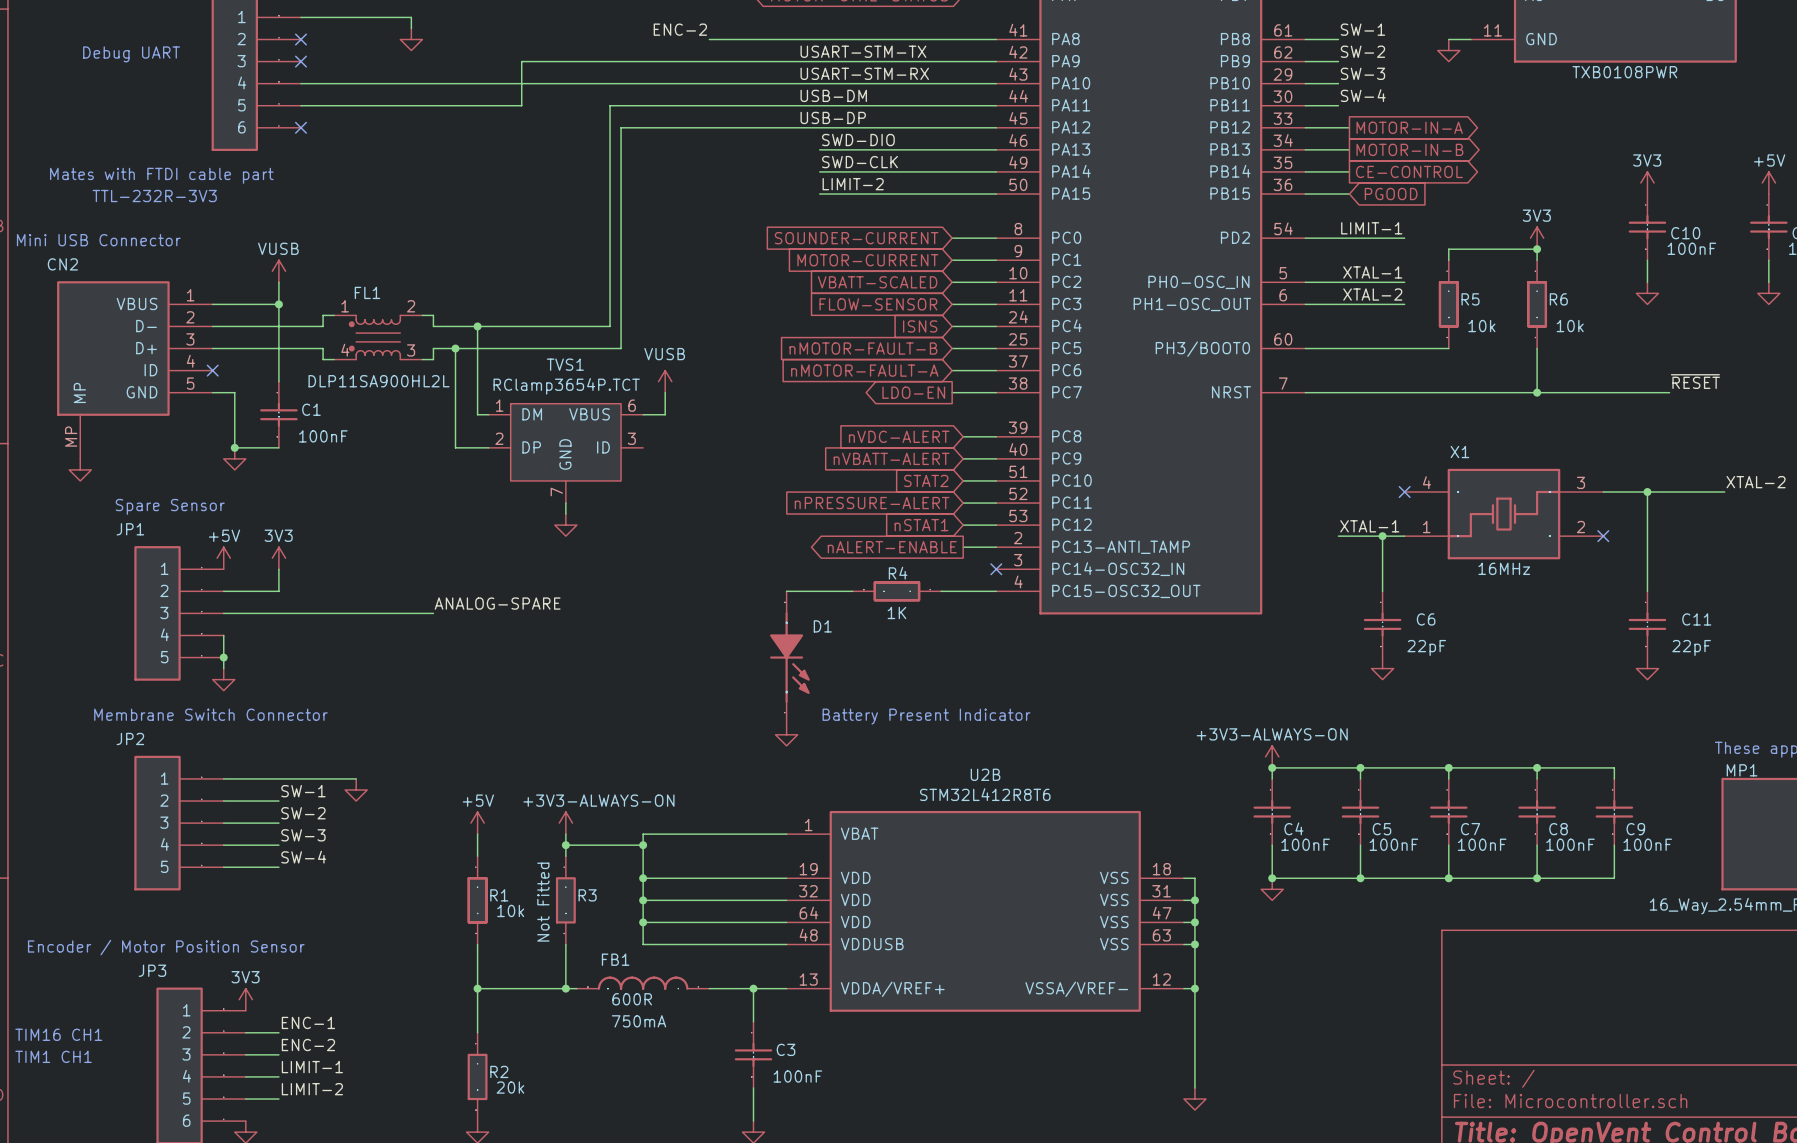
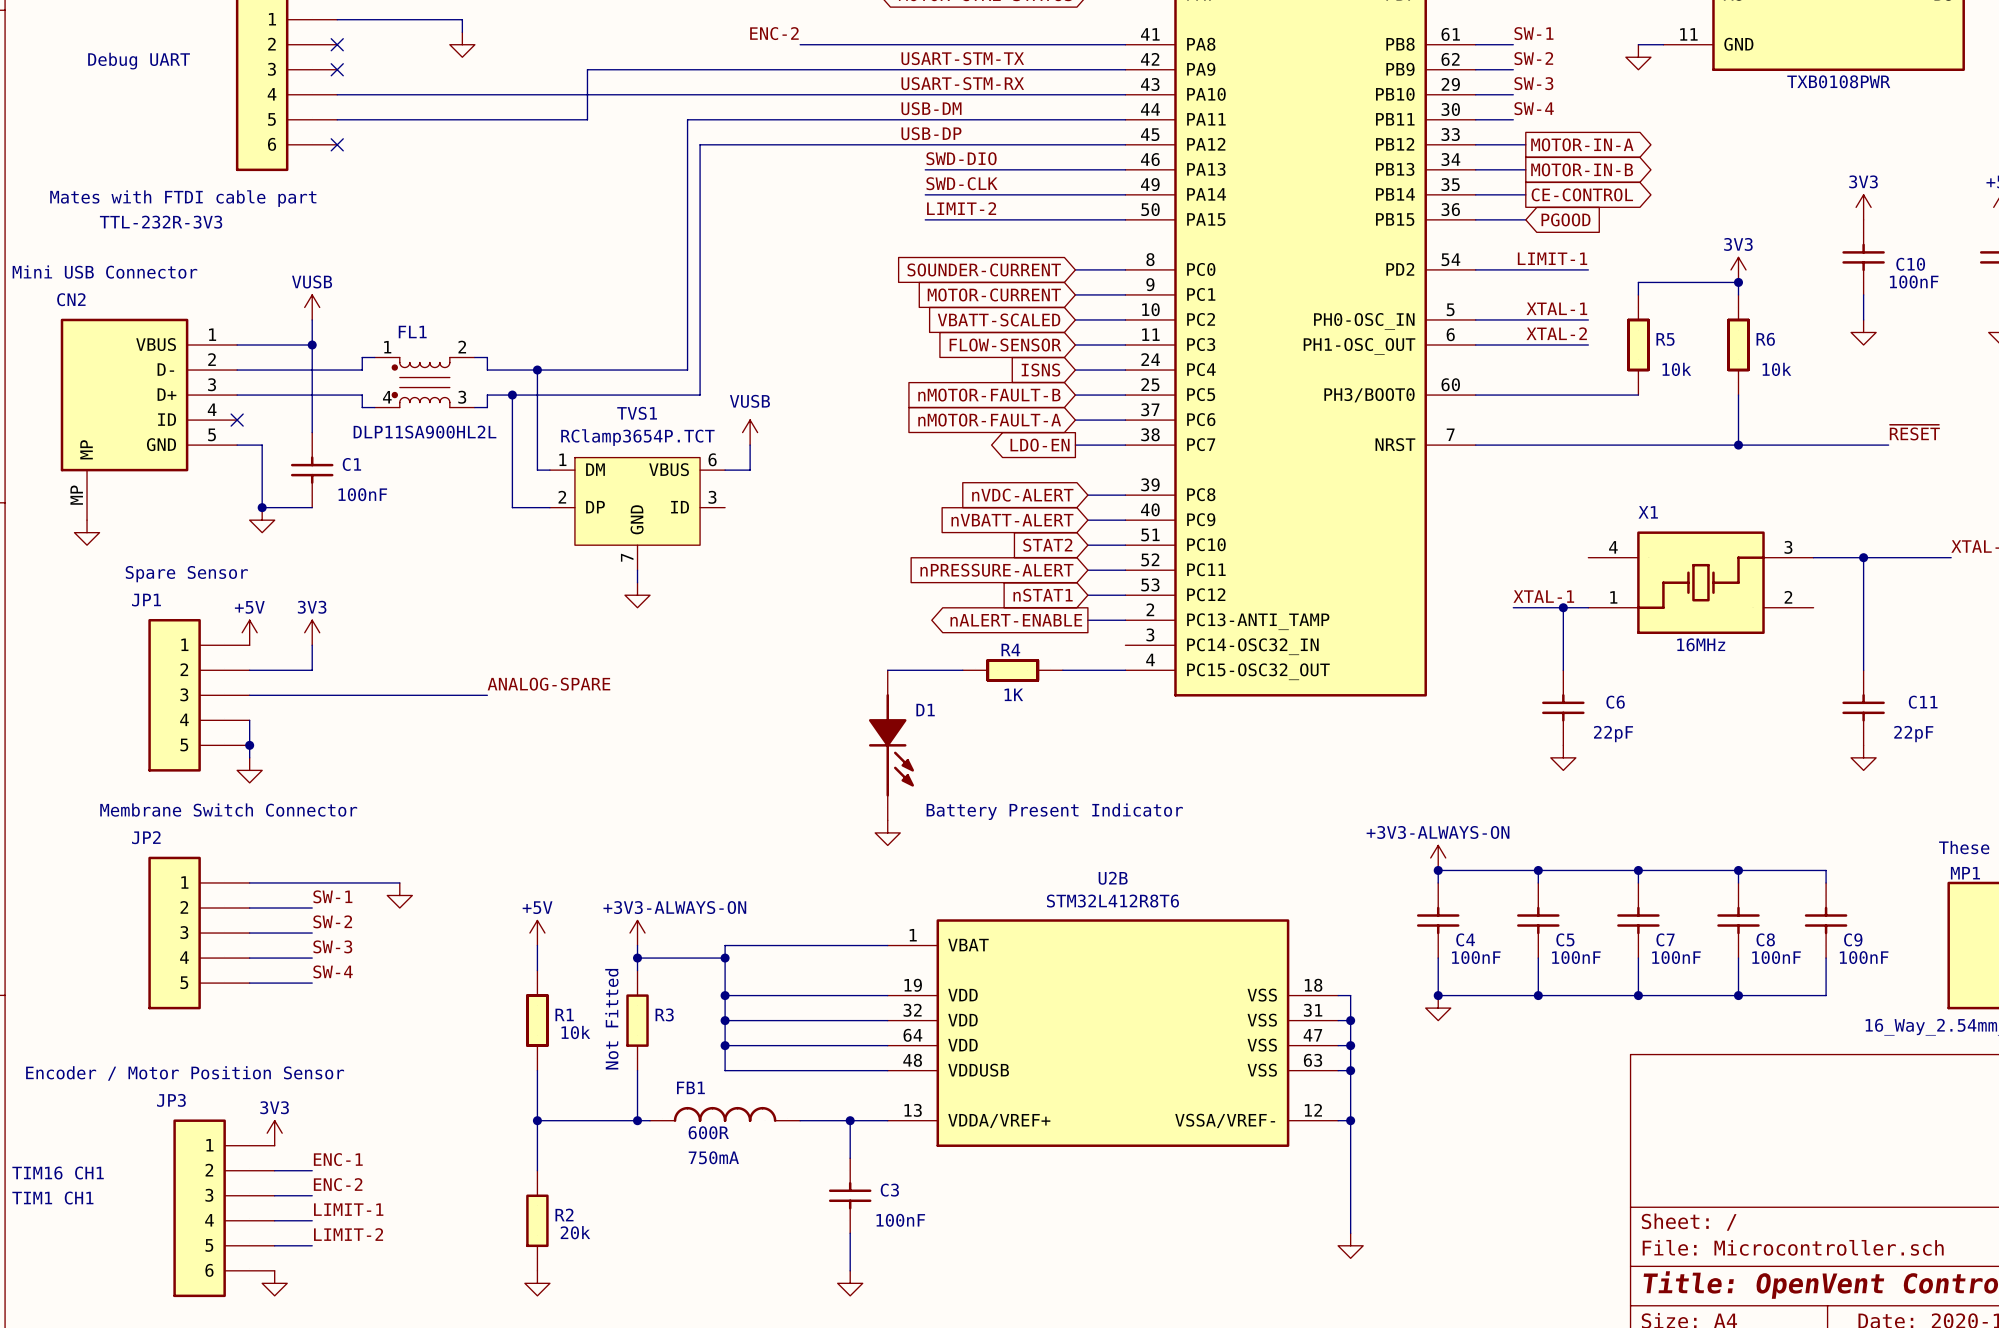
no-connect mark: (1404, 492) -> none
no-connect mark: (1603, 536) -> none
no-connect mark: (996, 569) -> none

